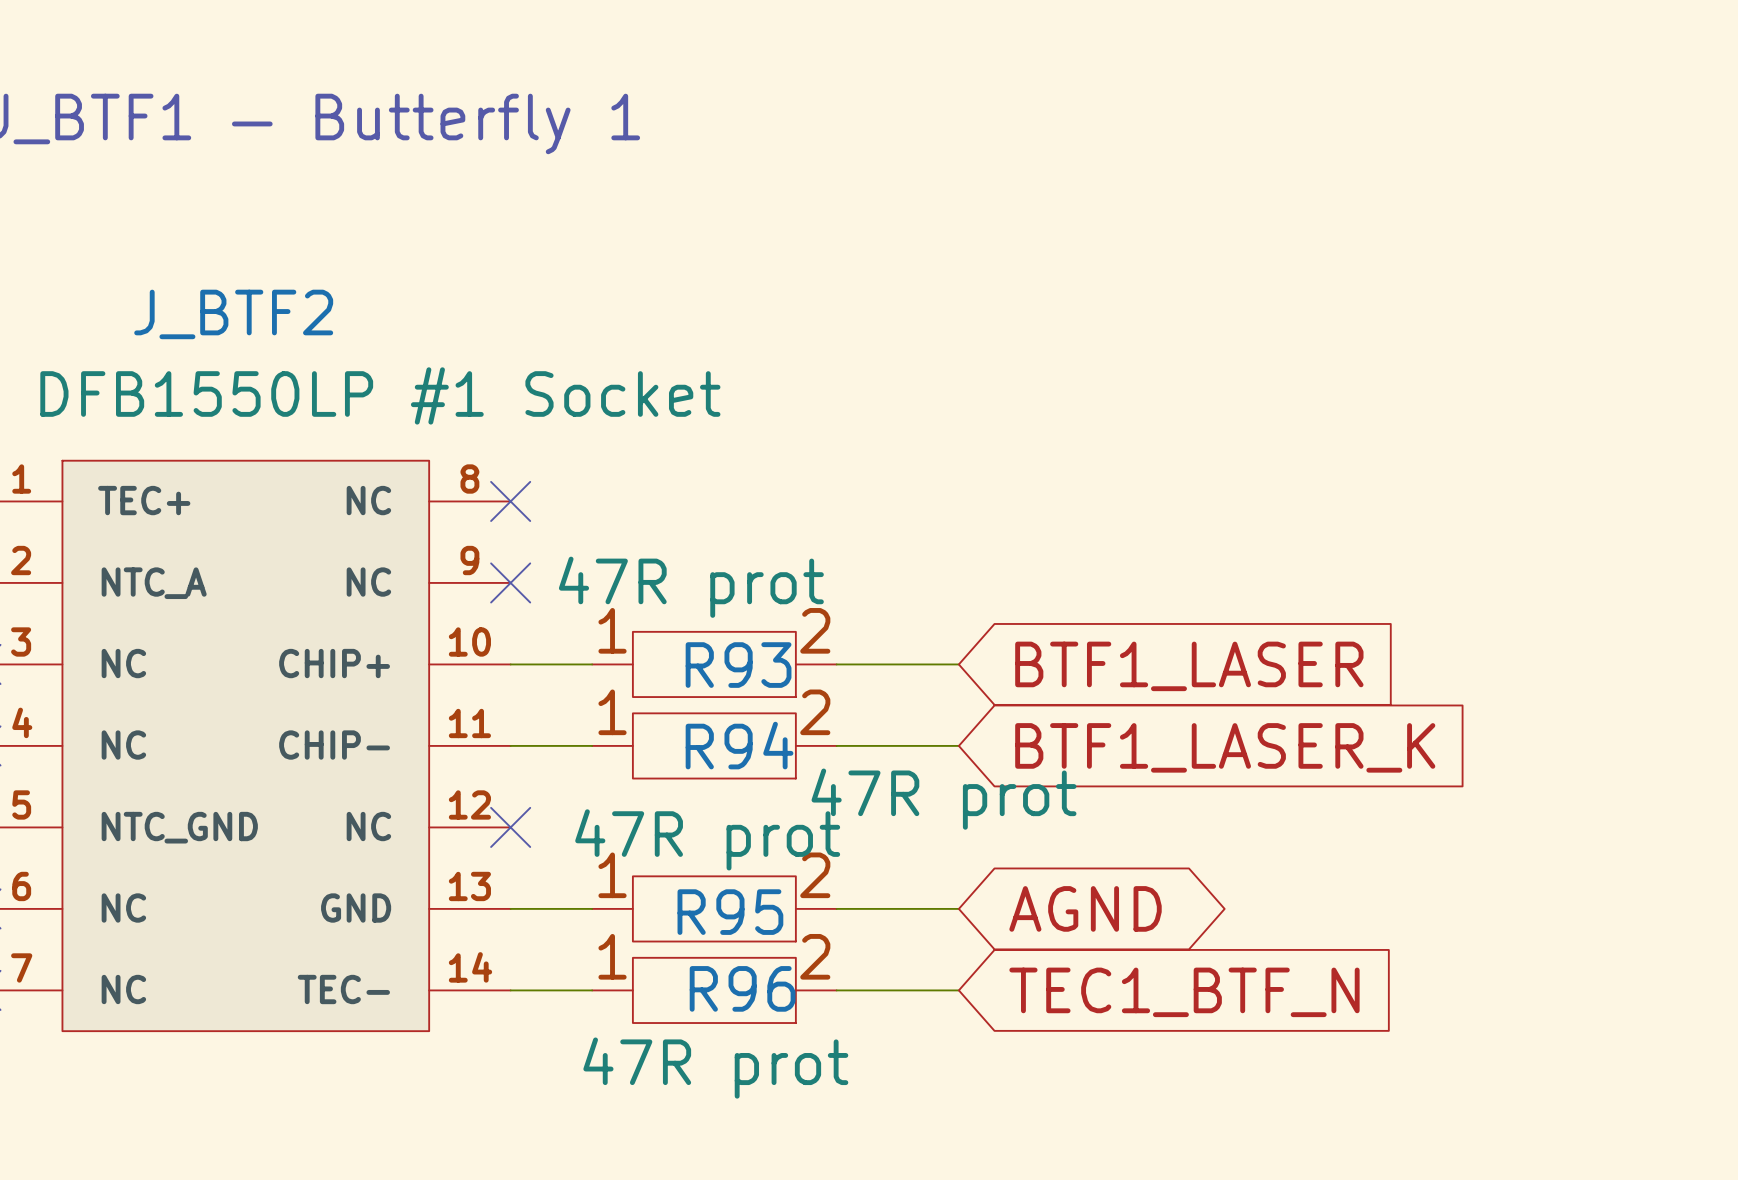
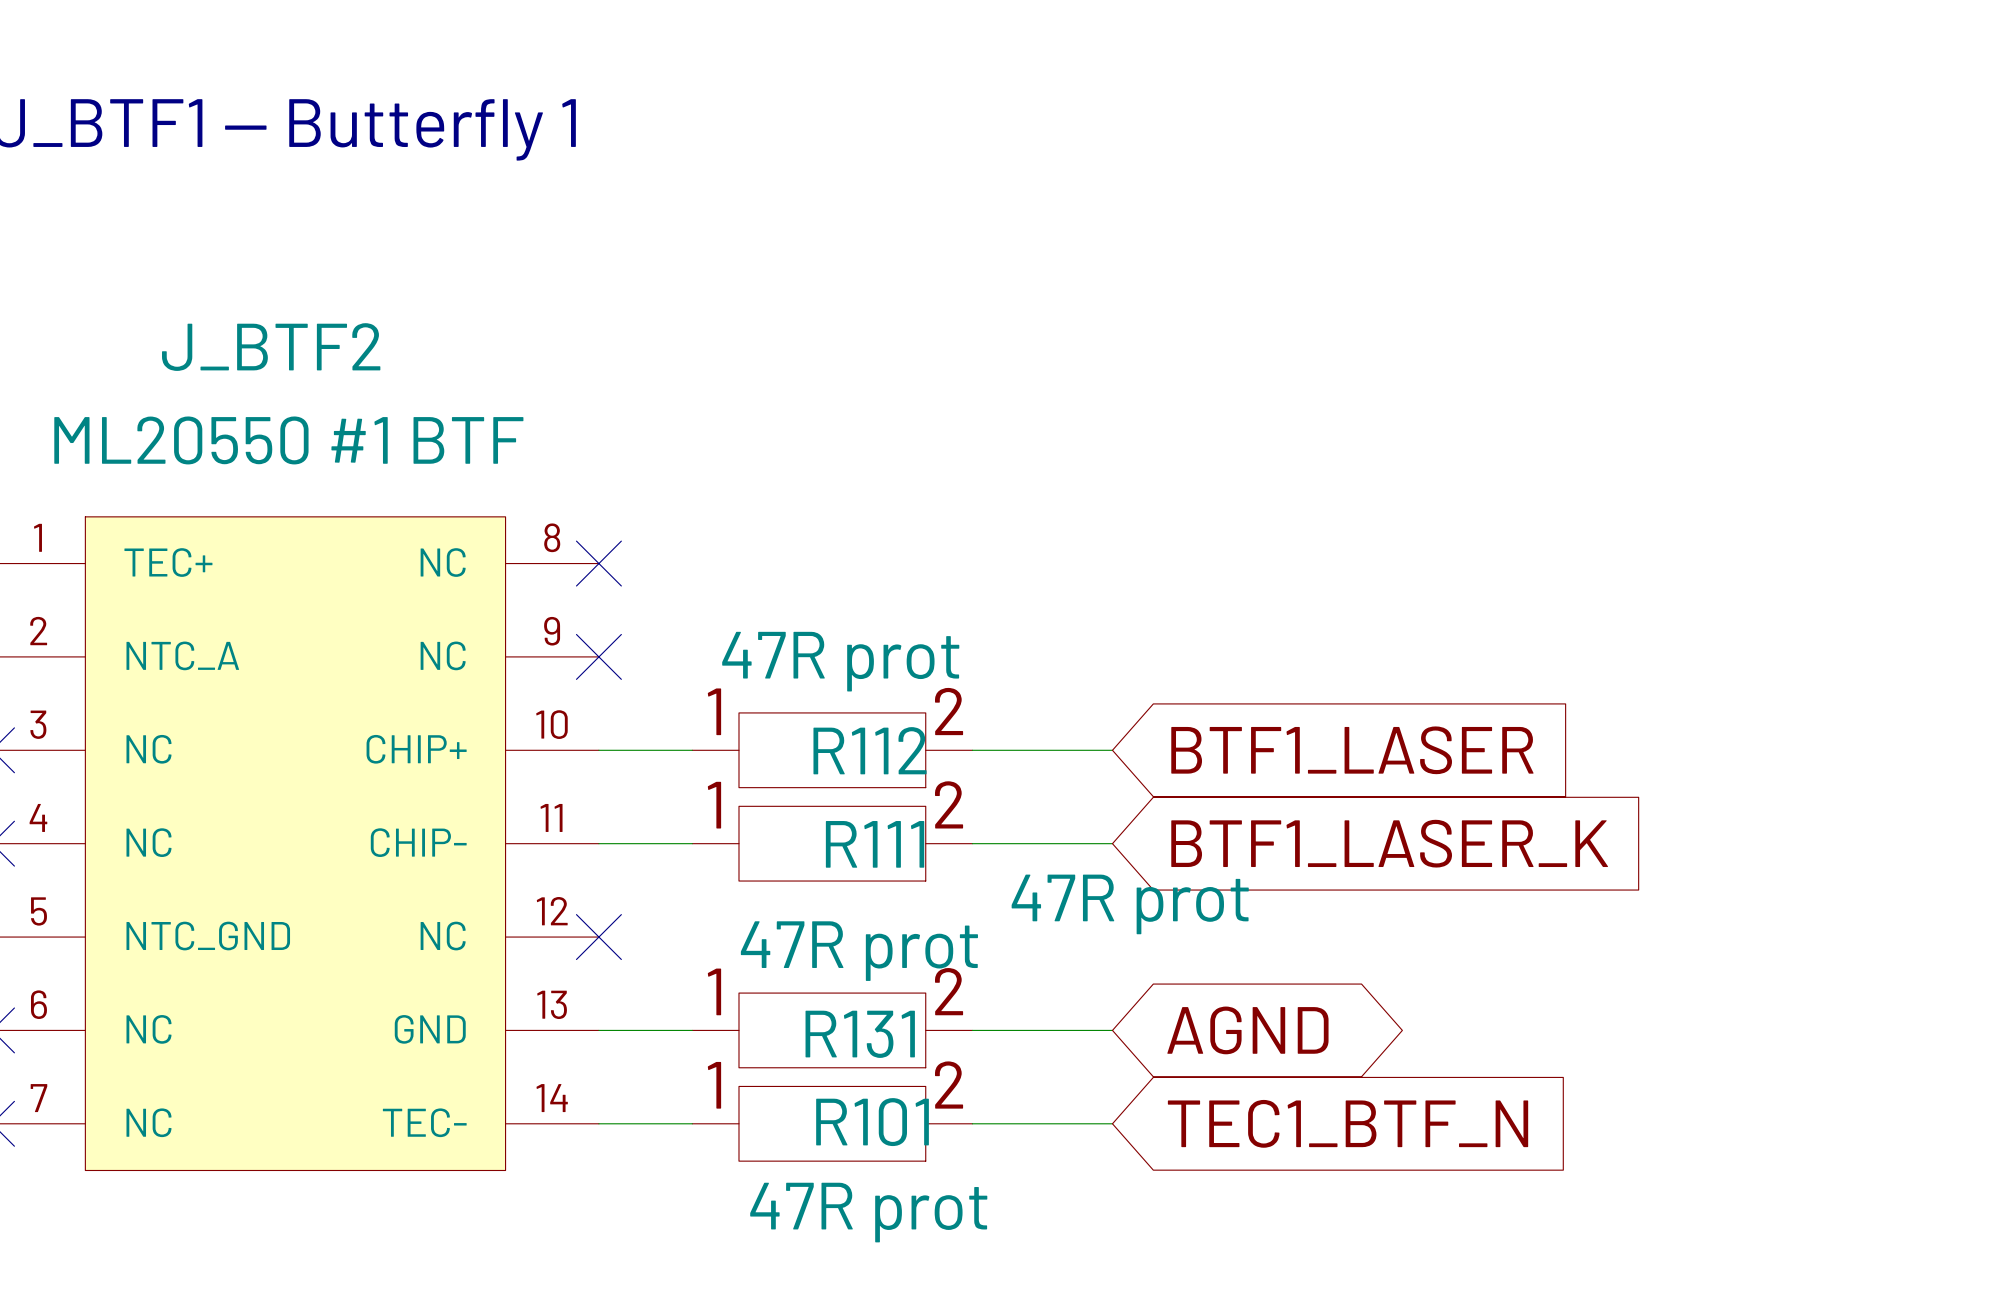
J_BTF2 value: DFB1550LP #1 Socket (380, 395) -> ML20550 #1 BTF (288, 440)
R93 name: R93 (738, 665) -> R112 (870, 750)
R94 name: R94 (739, 745) -> R111 (875, 844)
R95 name: R95 (730, 912) -> R131 (860, 1034)
R96 name: R96 (742, 988) -> R101 (872, 1122)

